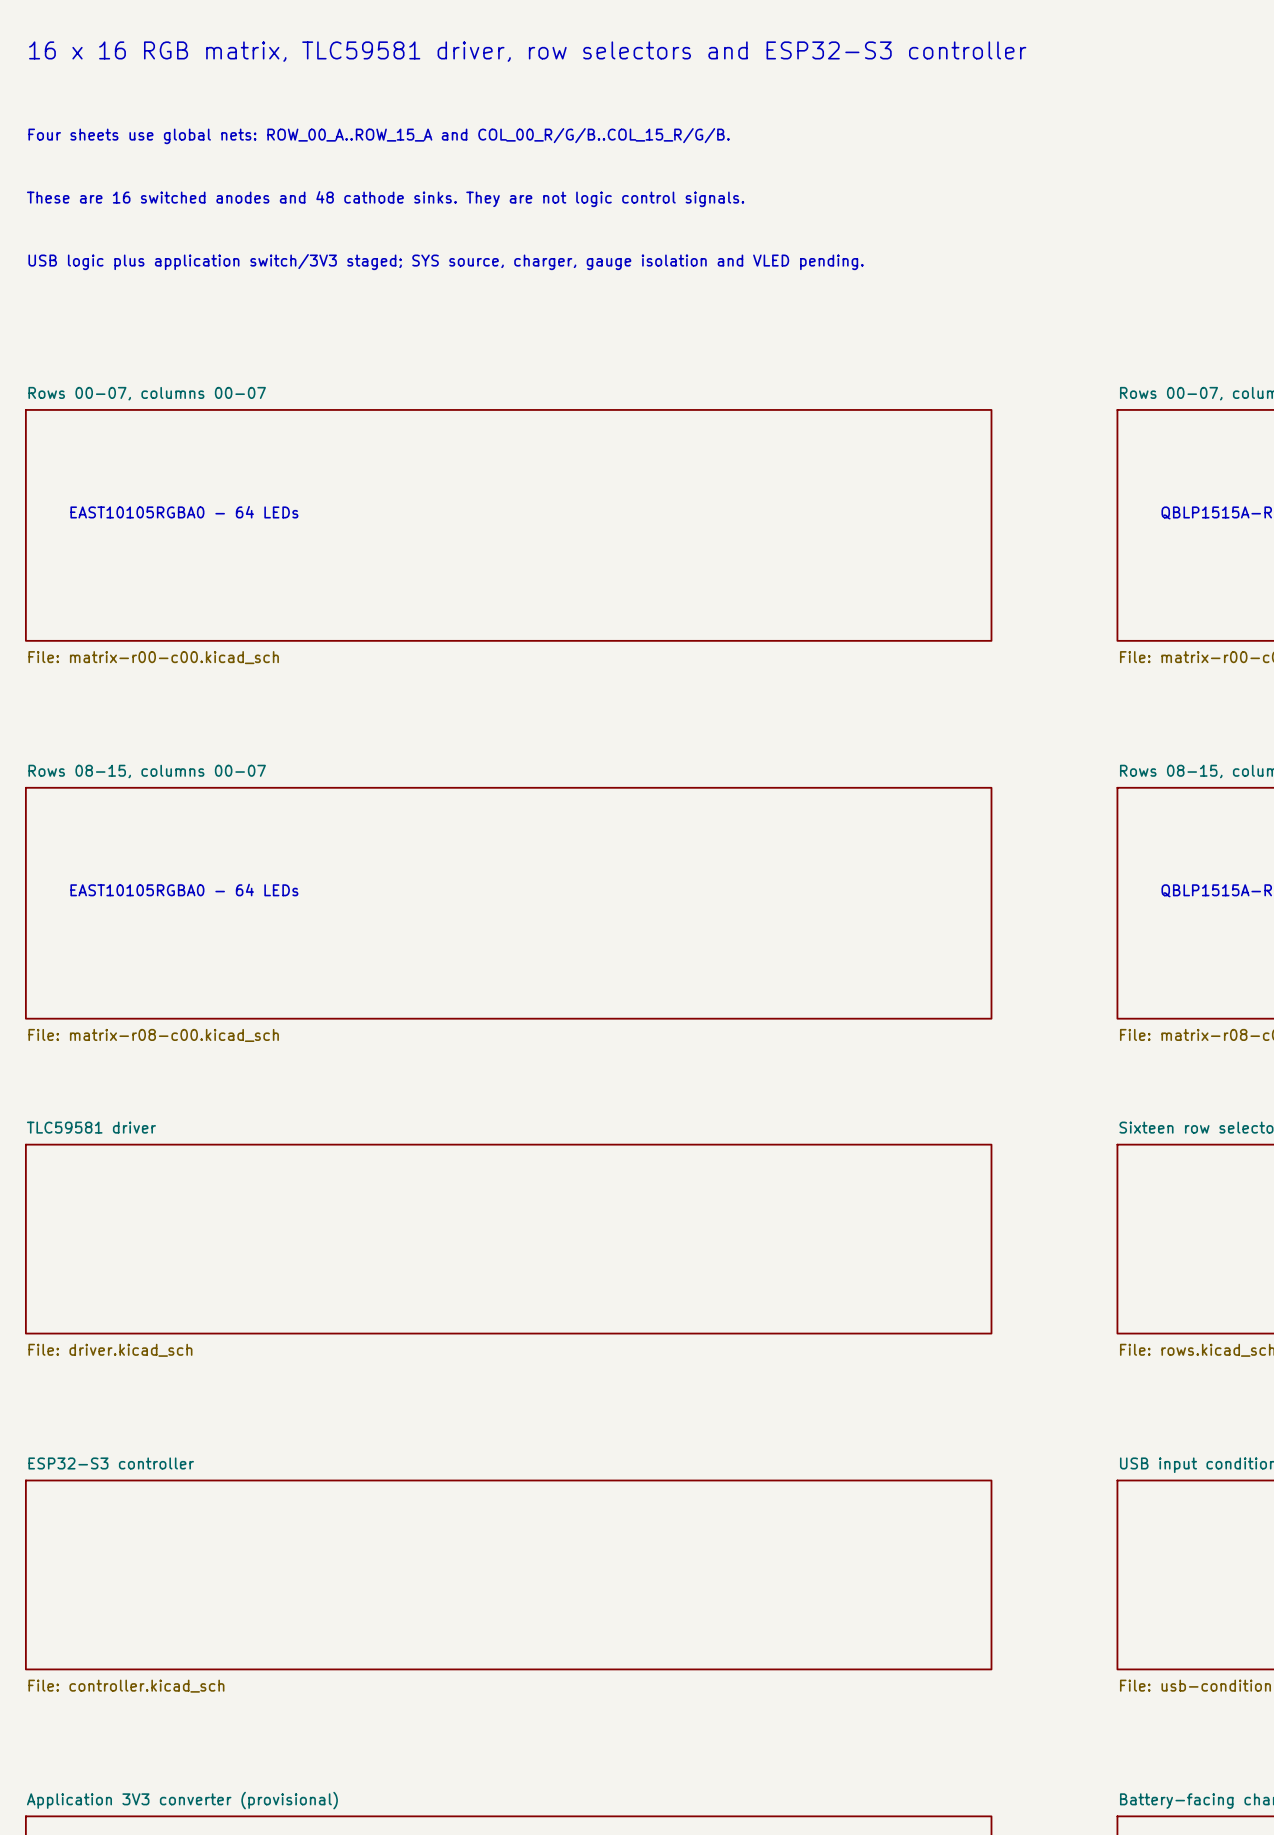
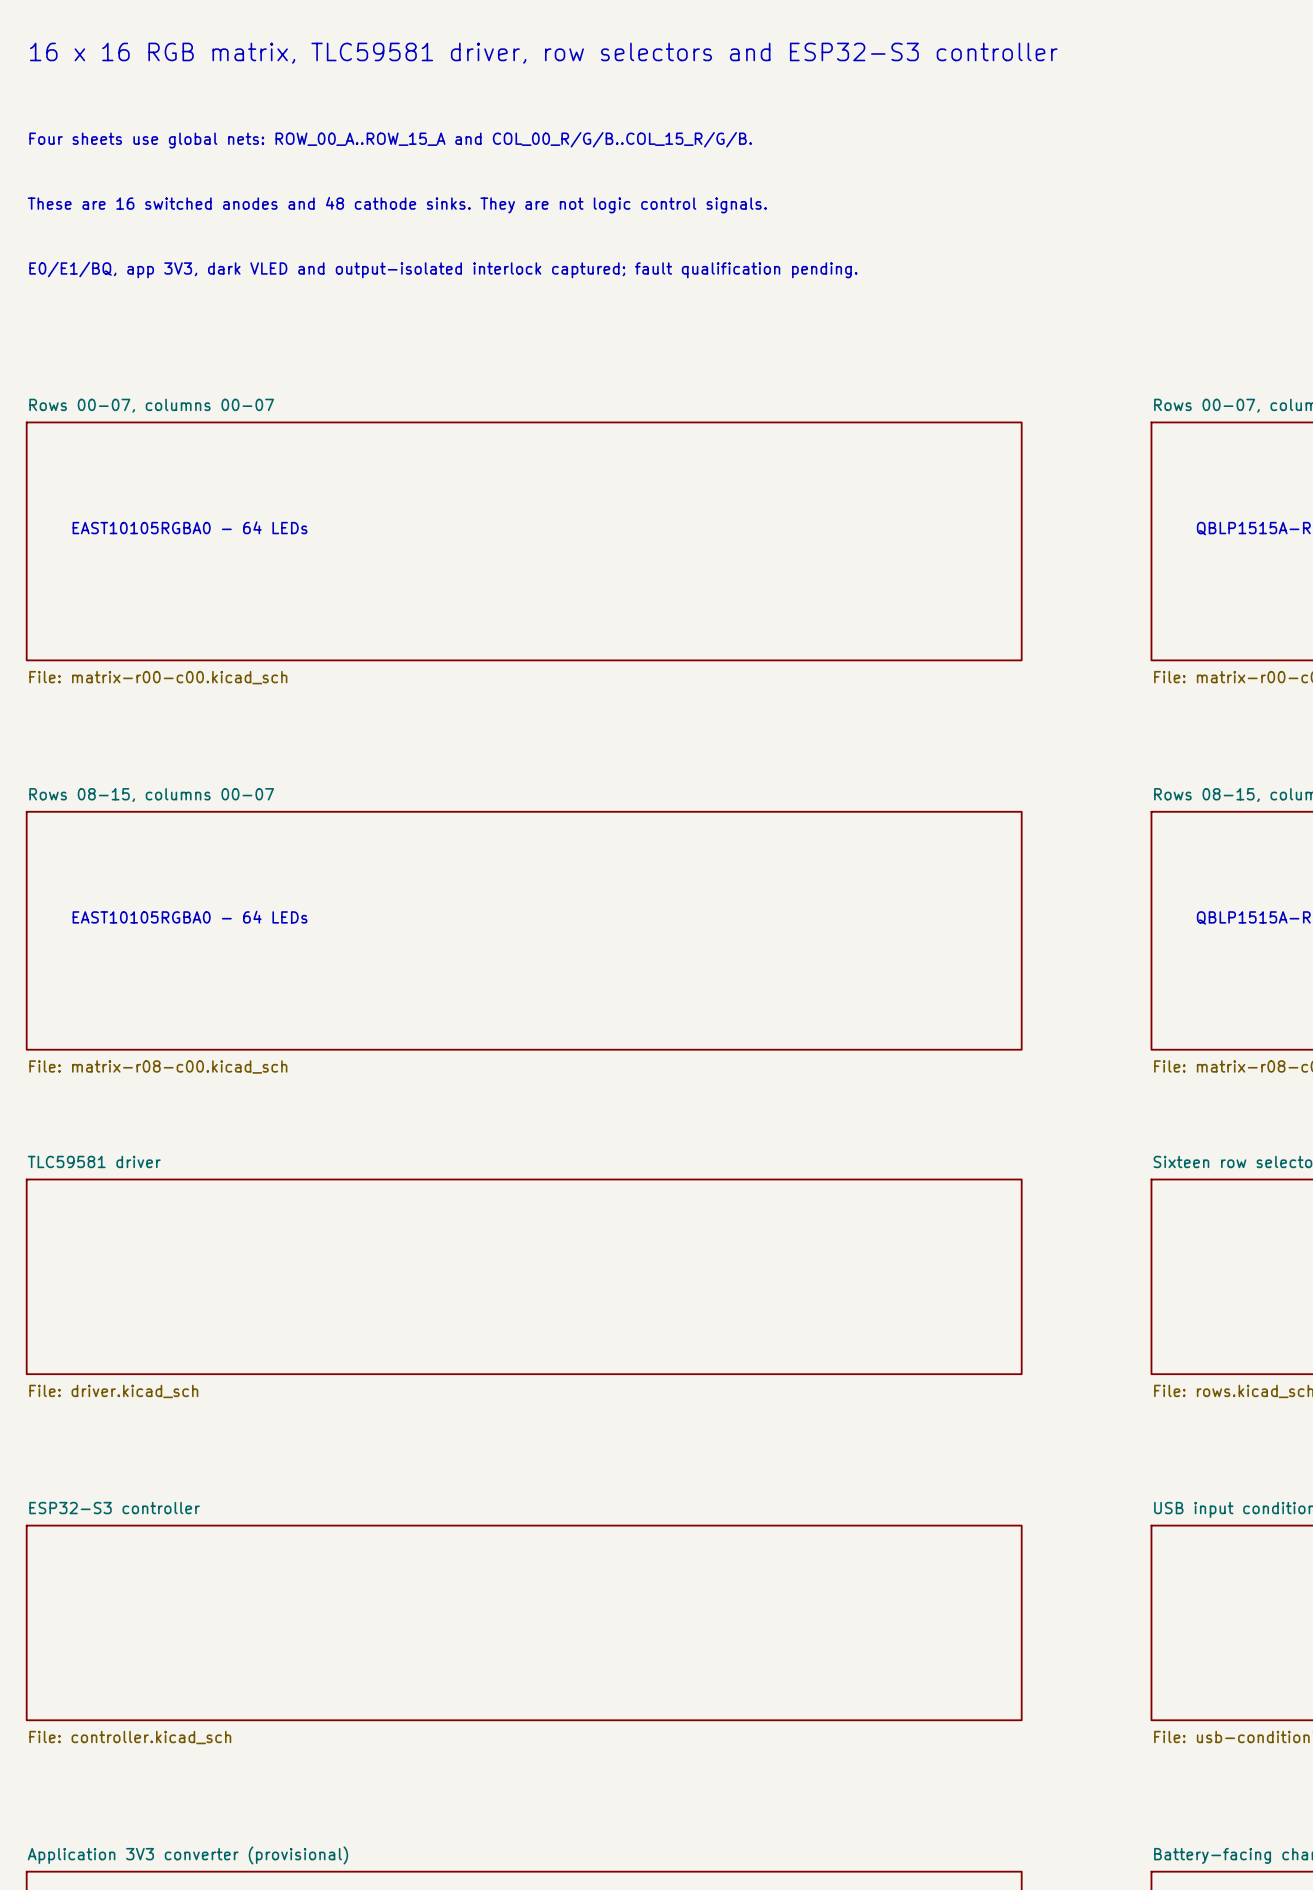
text: USB logic plus application switch/3V3 staged; SYS source, charger, gauge isolation and VLED pending. (446, 262) -> E0/E1/BQ, app 3V3, dark VLED and output-isolated interlock captured; fault qualification pending. (443, 270)

